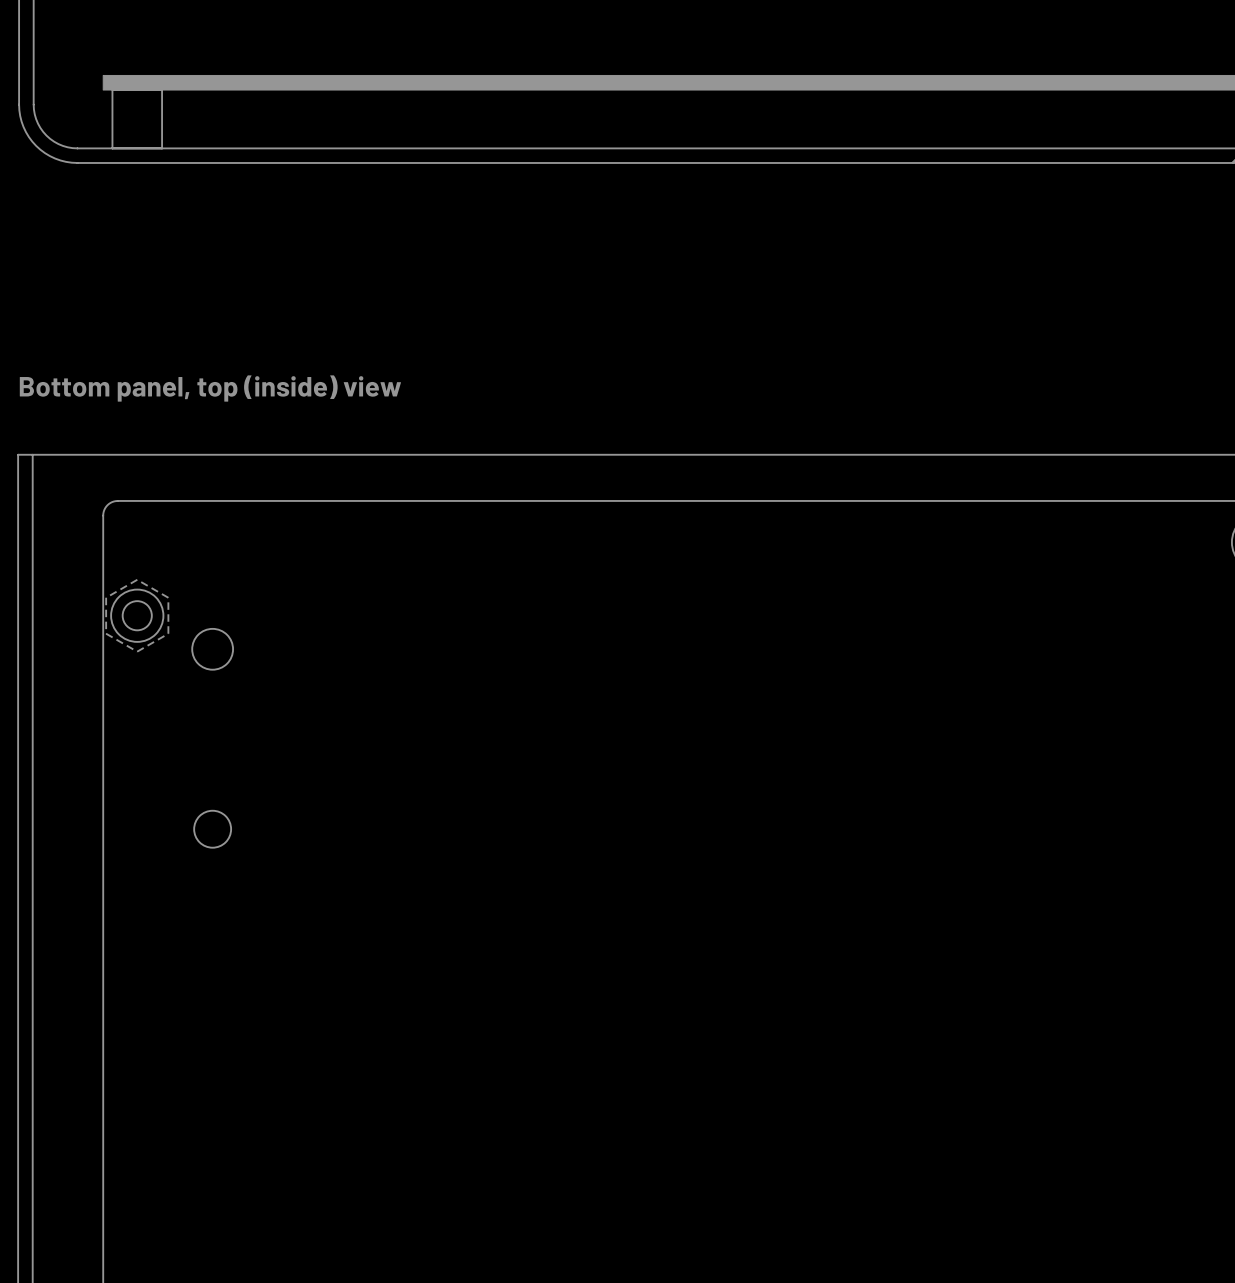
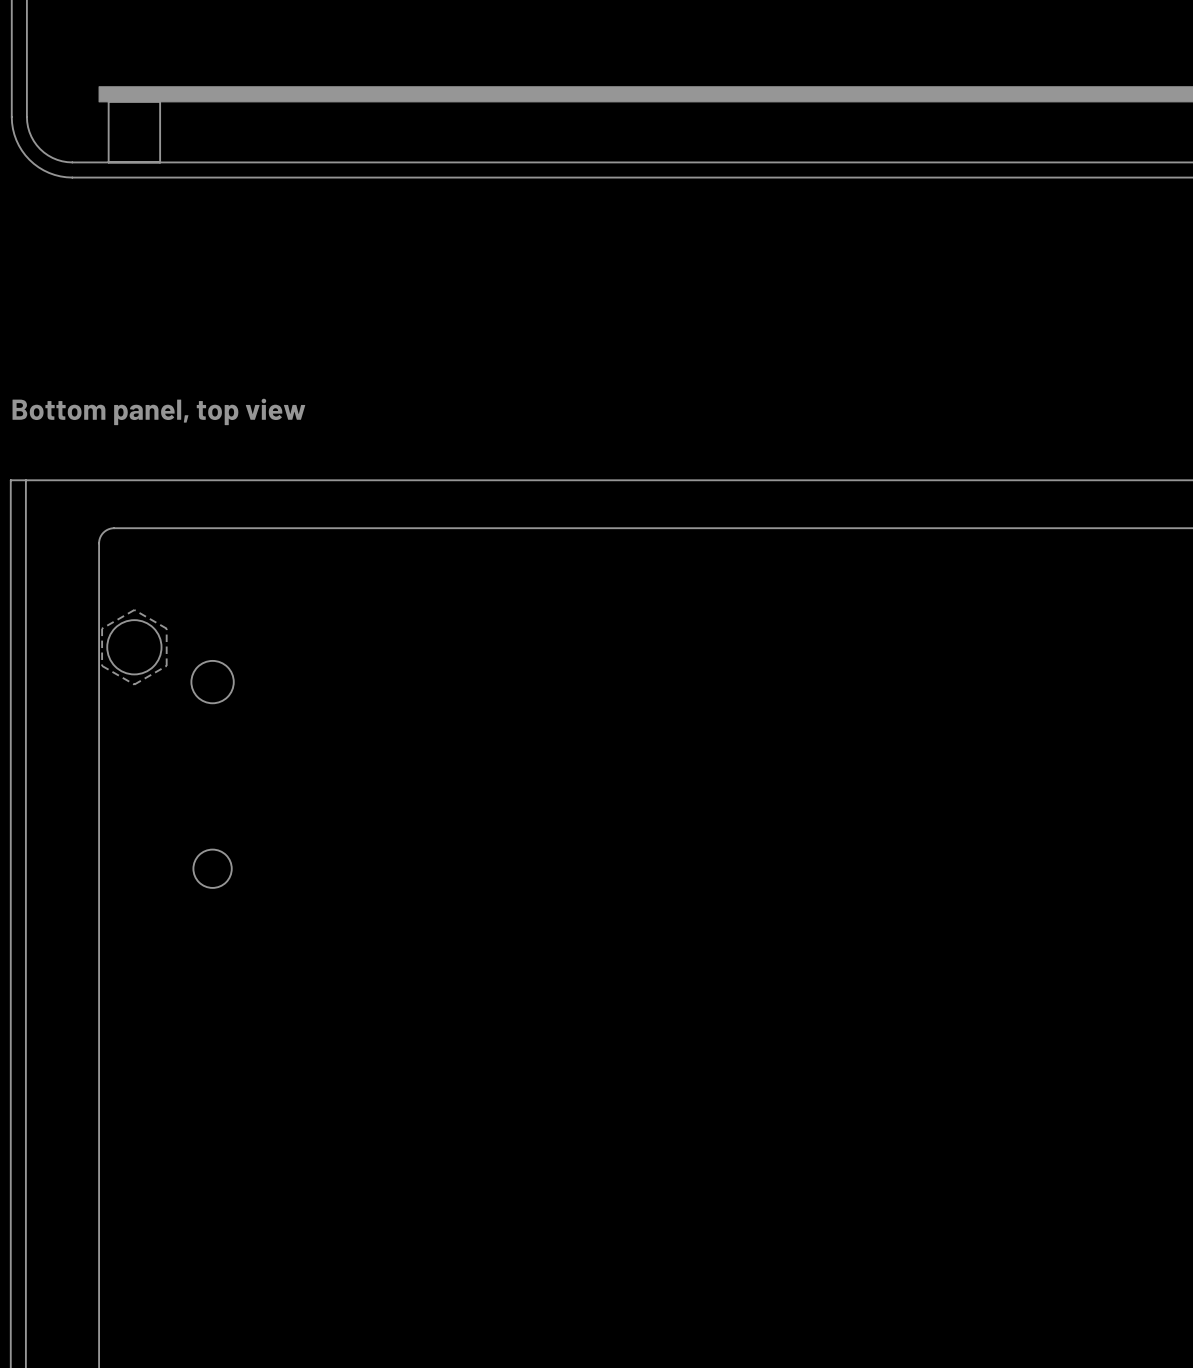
text: Bottom panel, top (inside) view (210, 388) -> Bottom panel, top view (158, 411)
drawing: [122, 600, 153, 631] -> none

